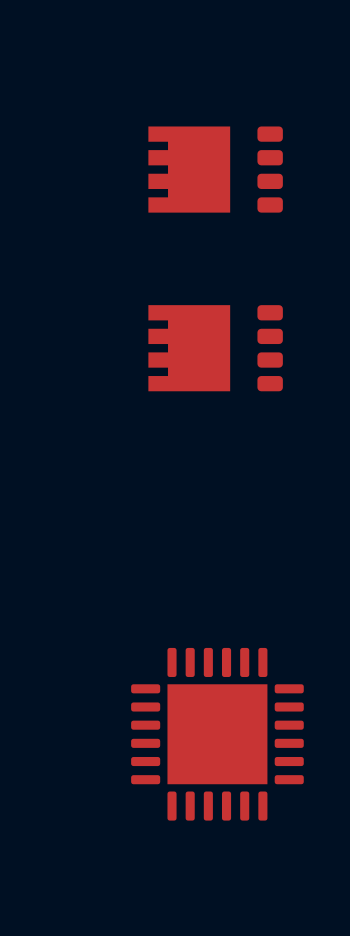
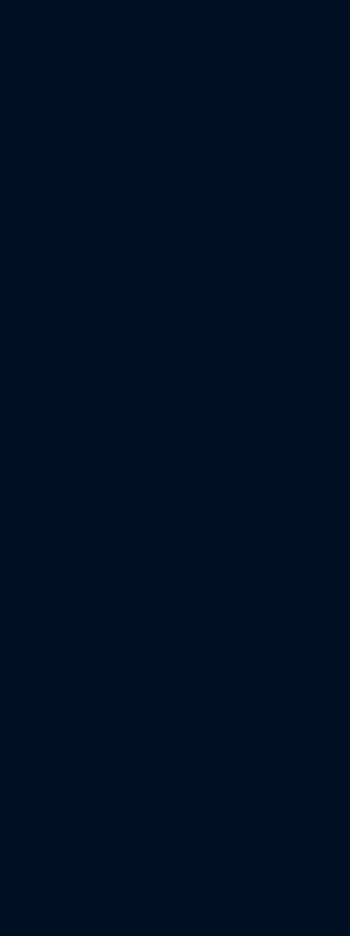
part: (215, 169) -> none
part: (215, 348) -> none
part: (217, 734) -> none

